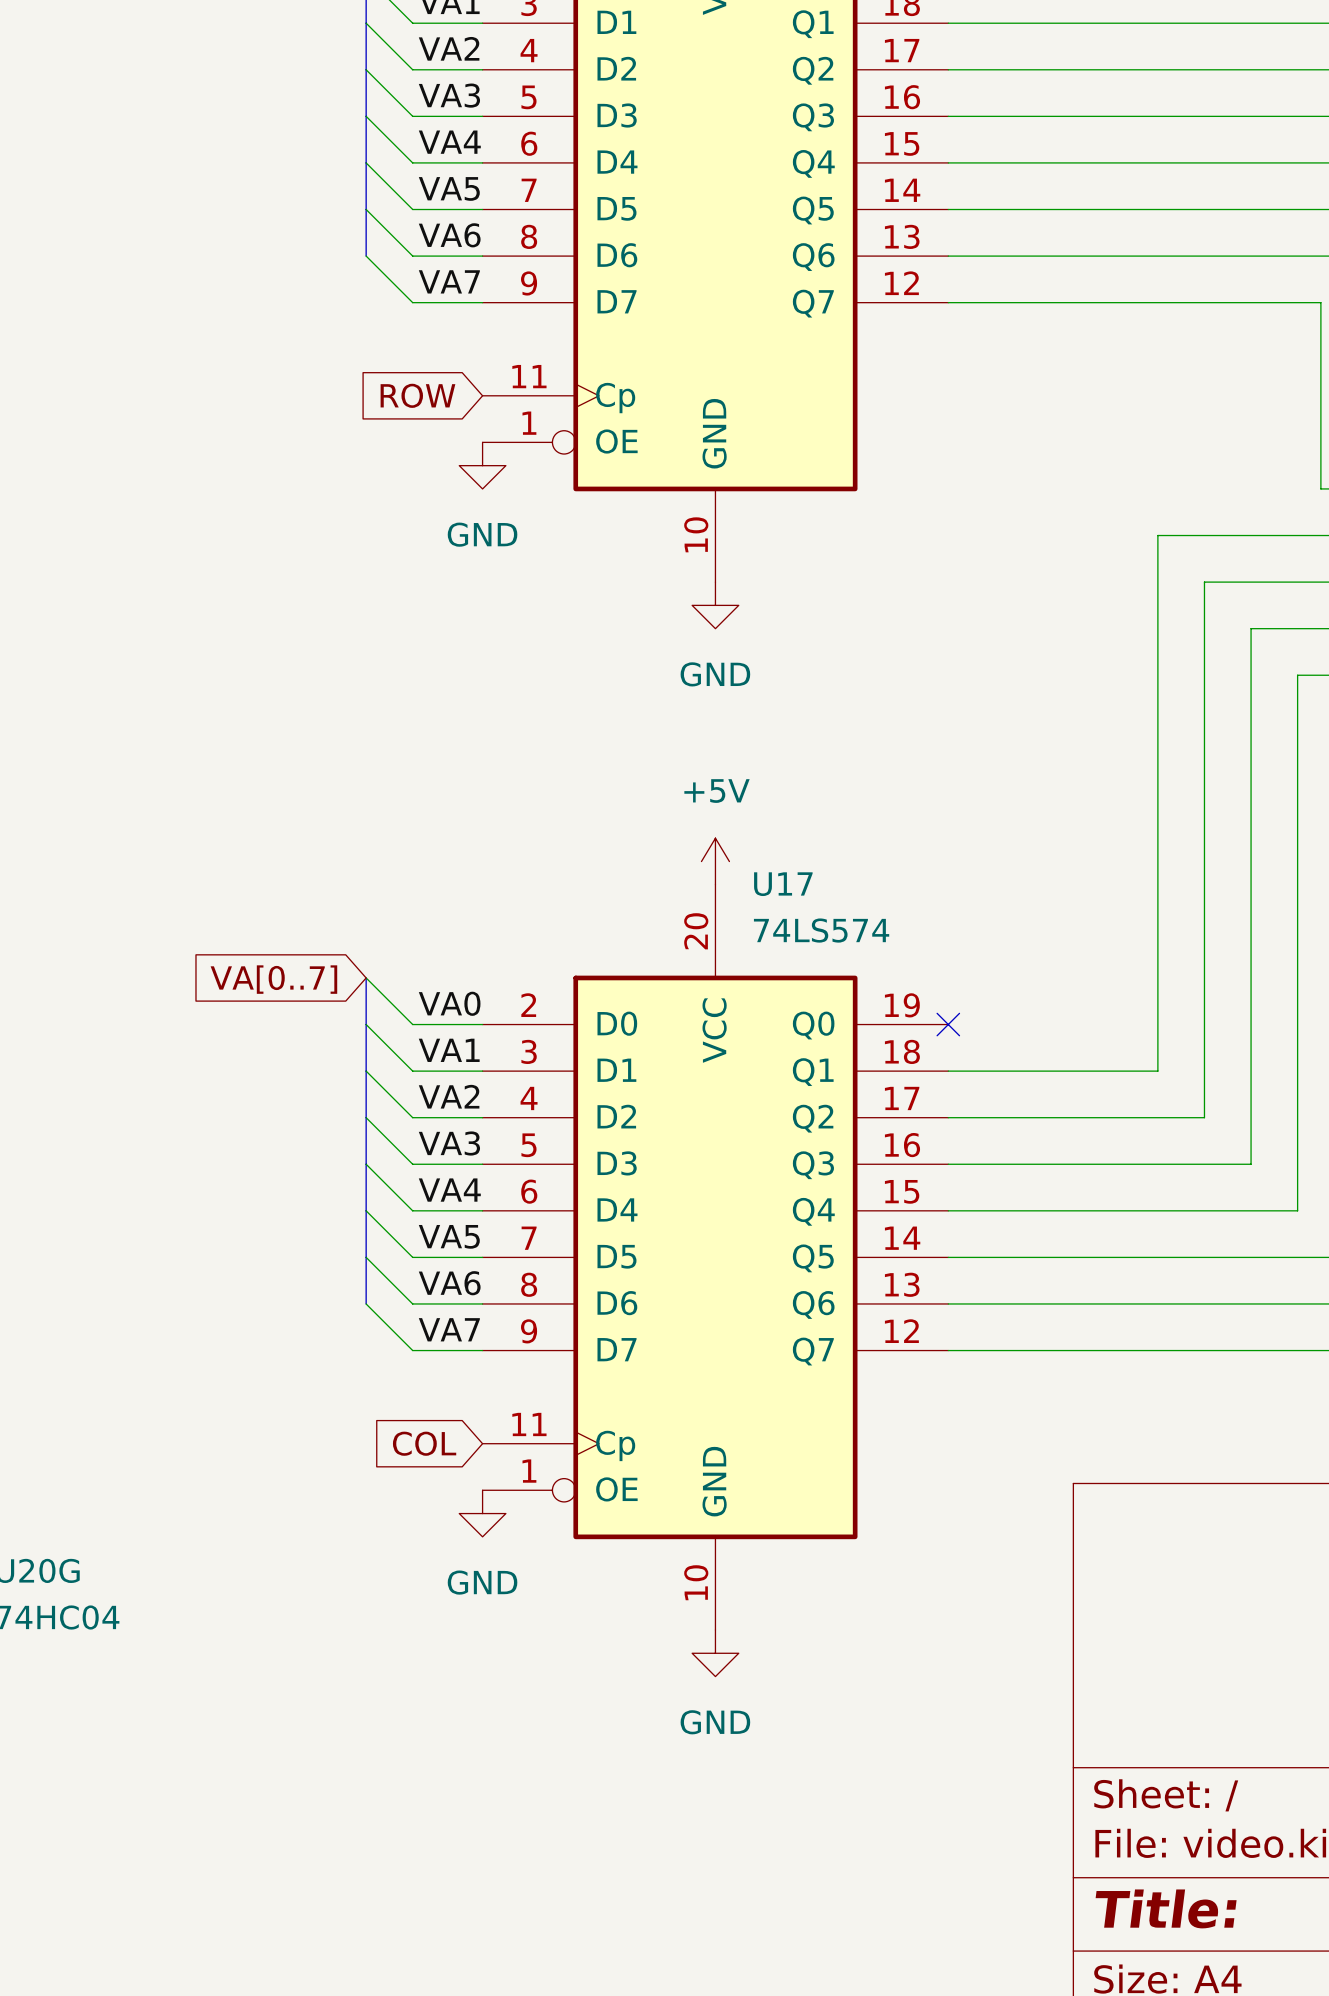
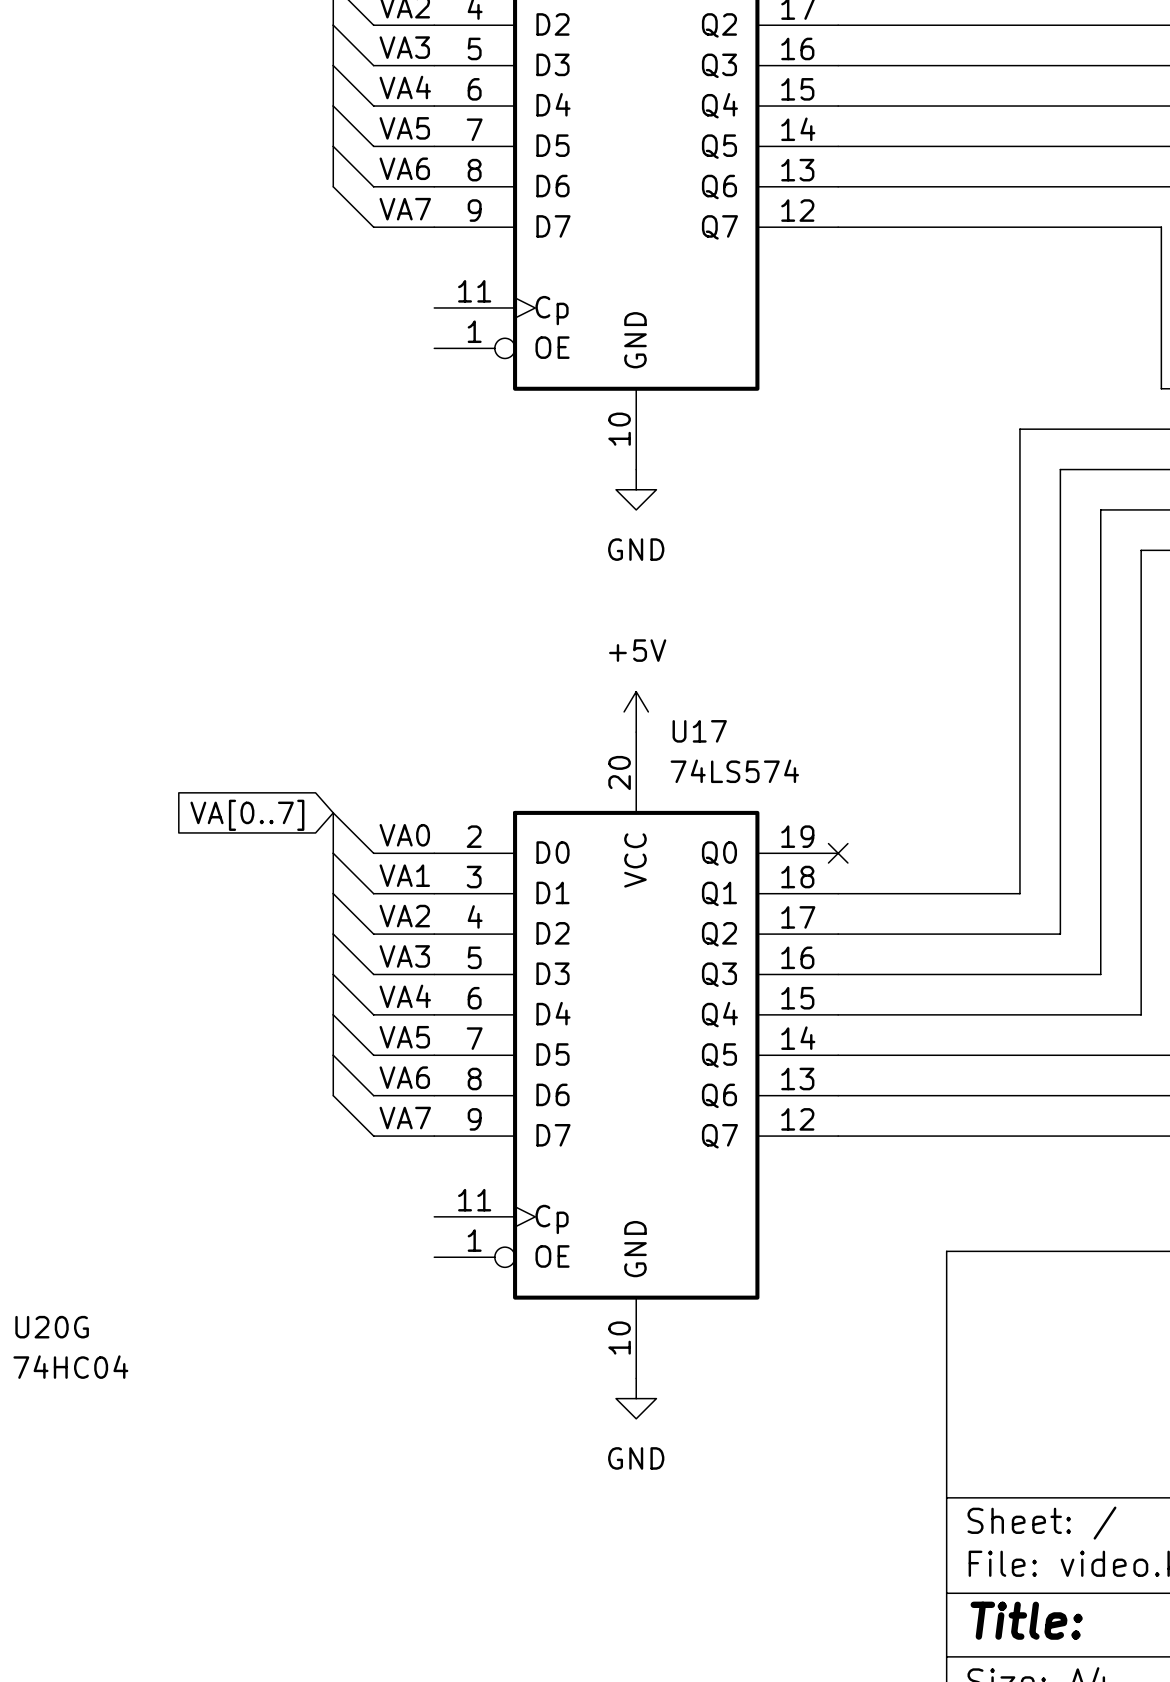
global label: ROW (417, 395) -> none
power symbol: GND (482, 465) -> none
global label: COL (424, 1443) -> none
power symbol: GND (482, 1513) -> none

